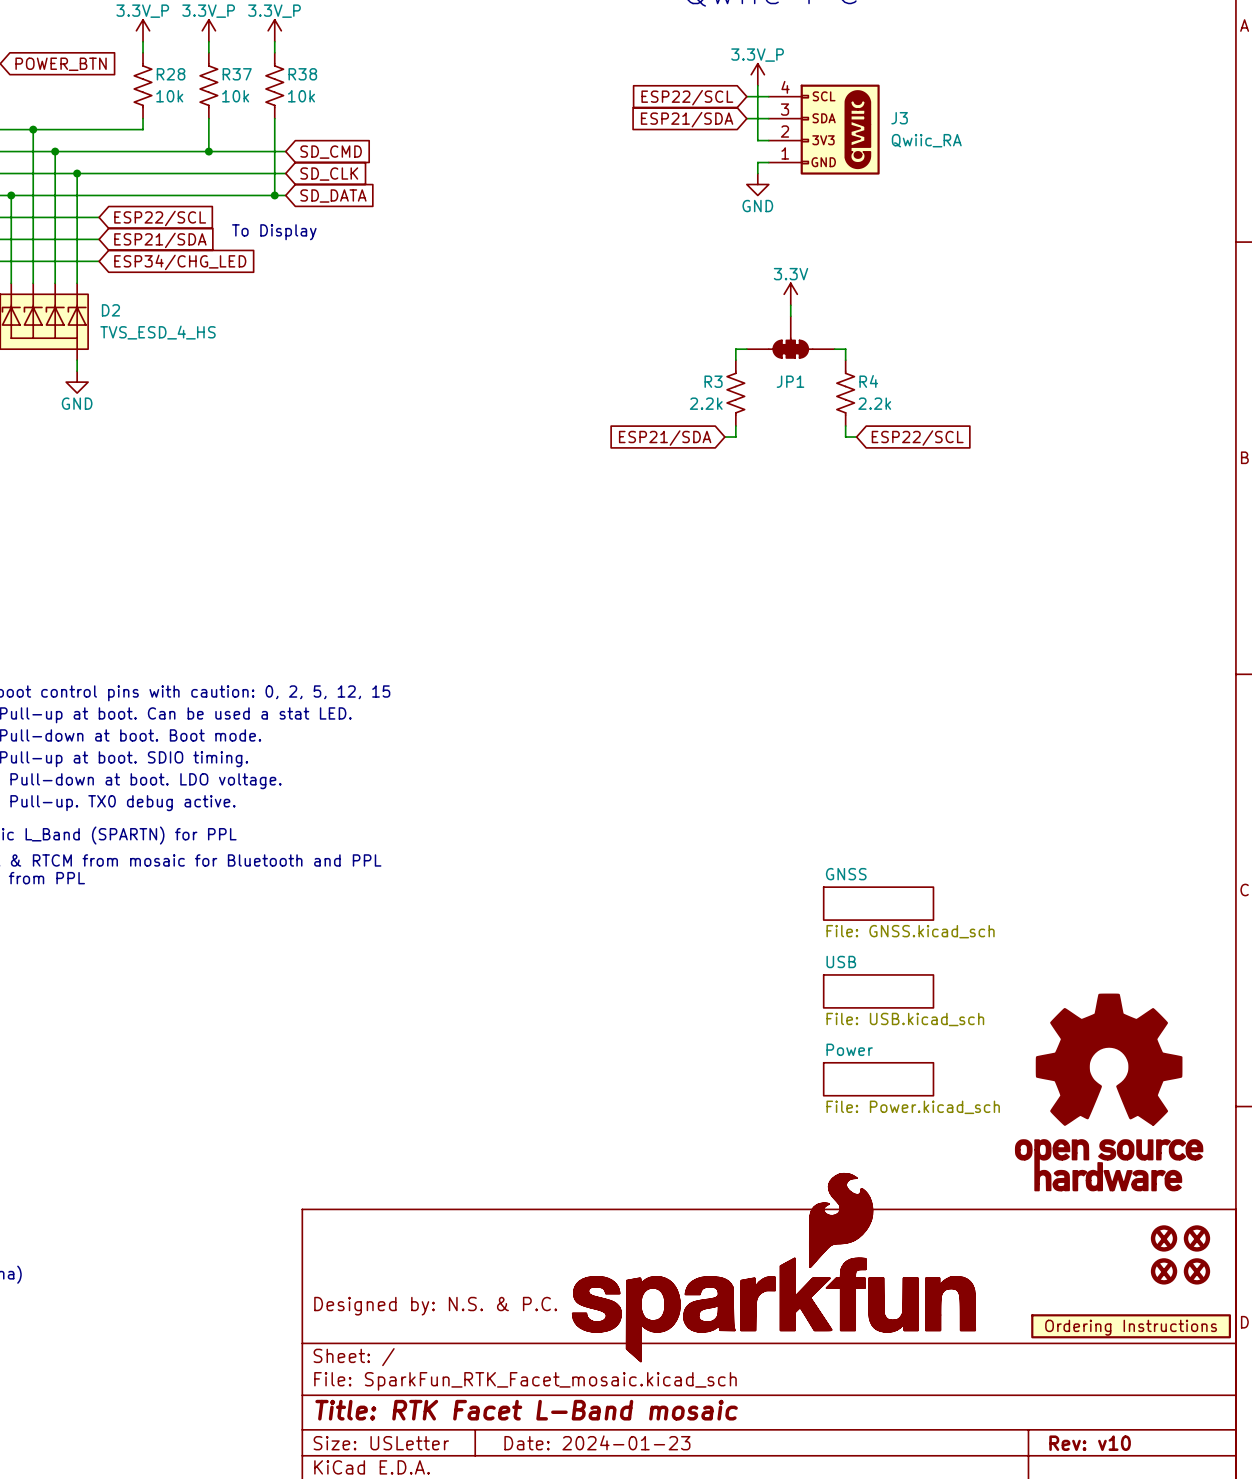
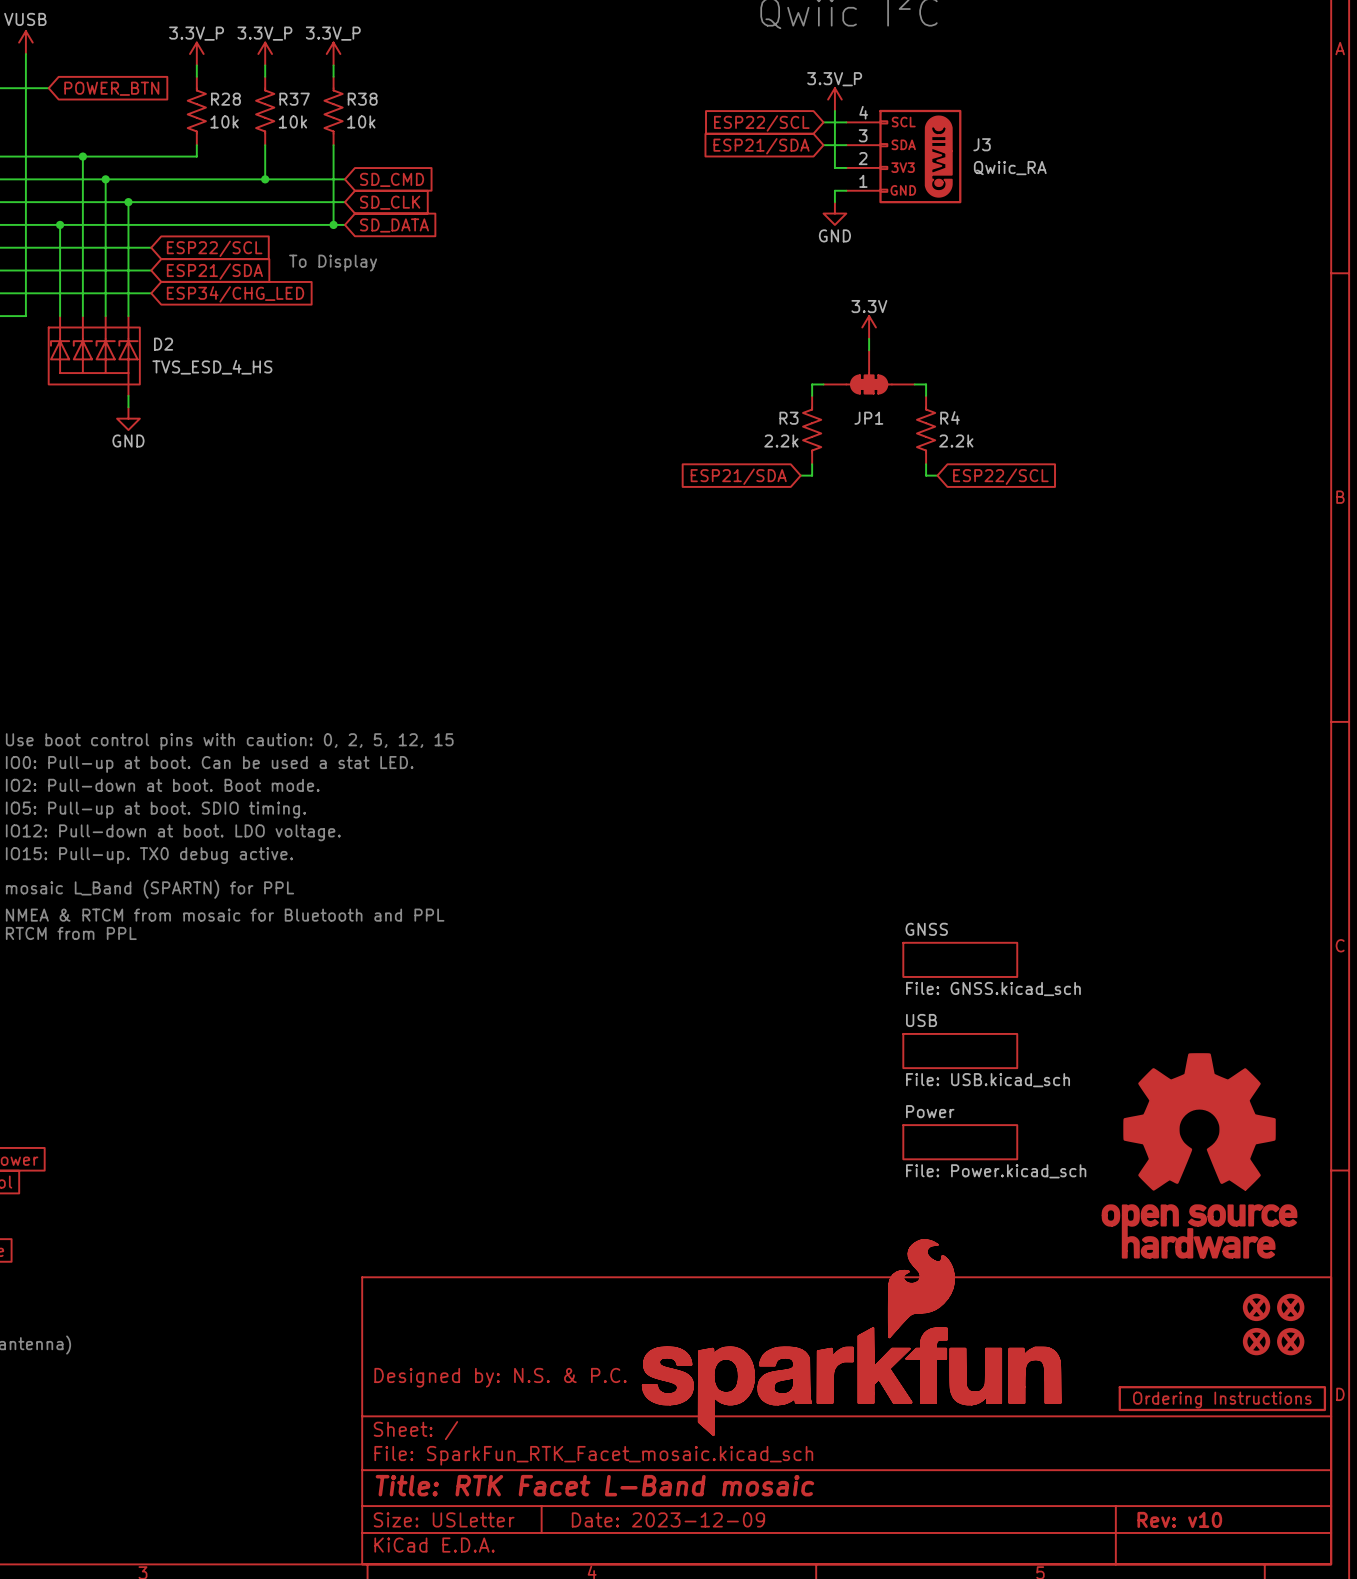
title block: Date: 2024-01-23 (597, 1442) -> Date: 2023-12-09 (668, 1519)

